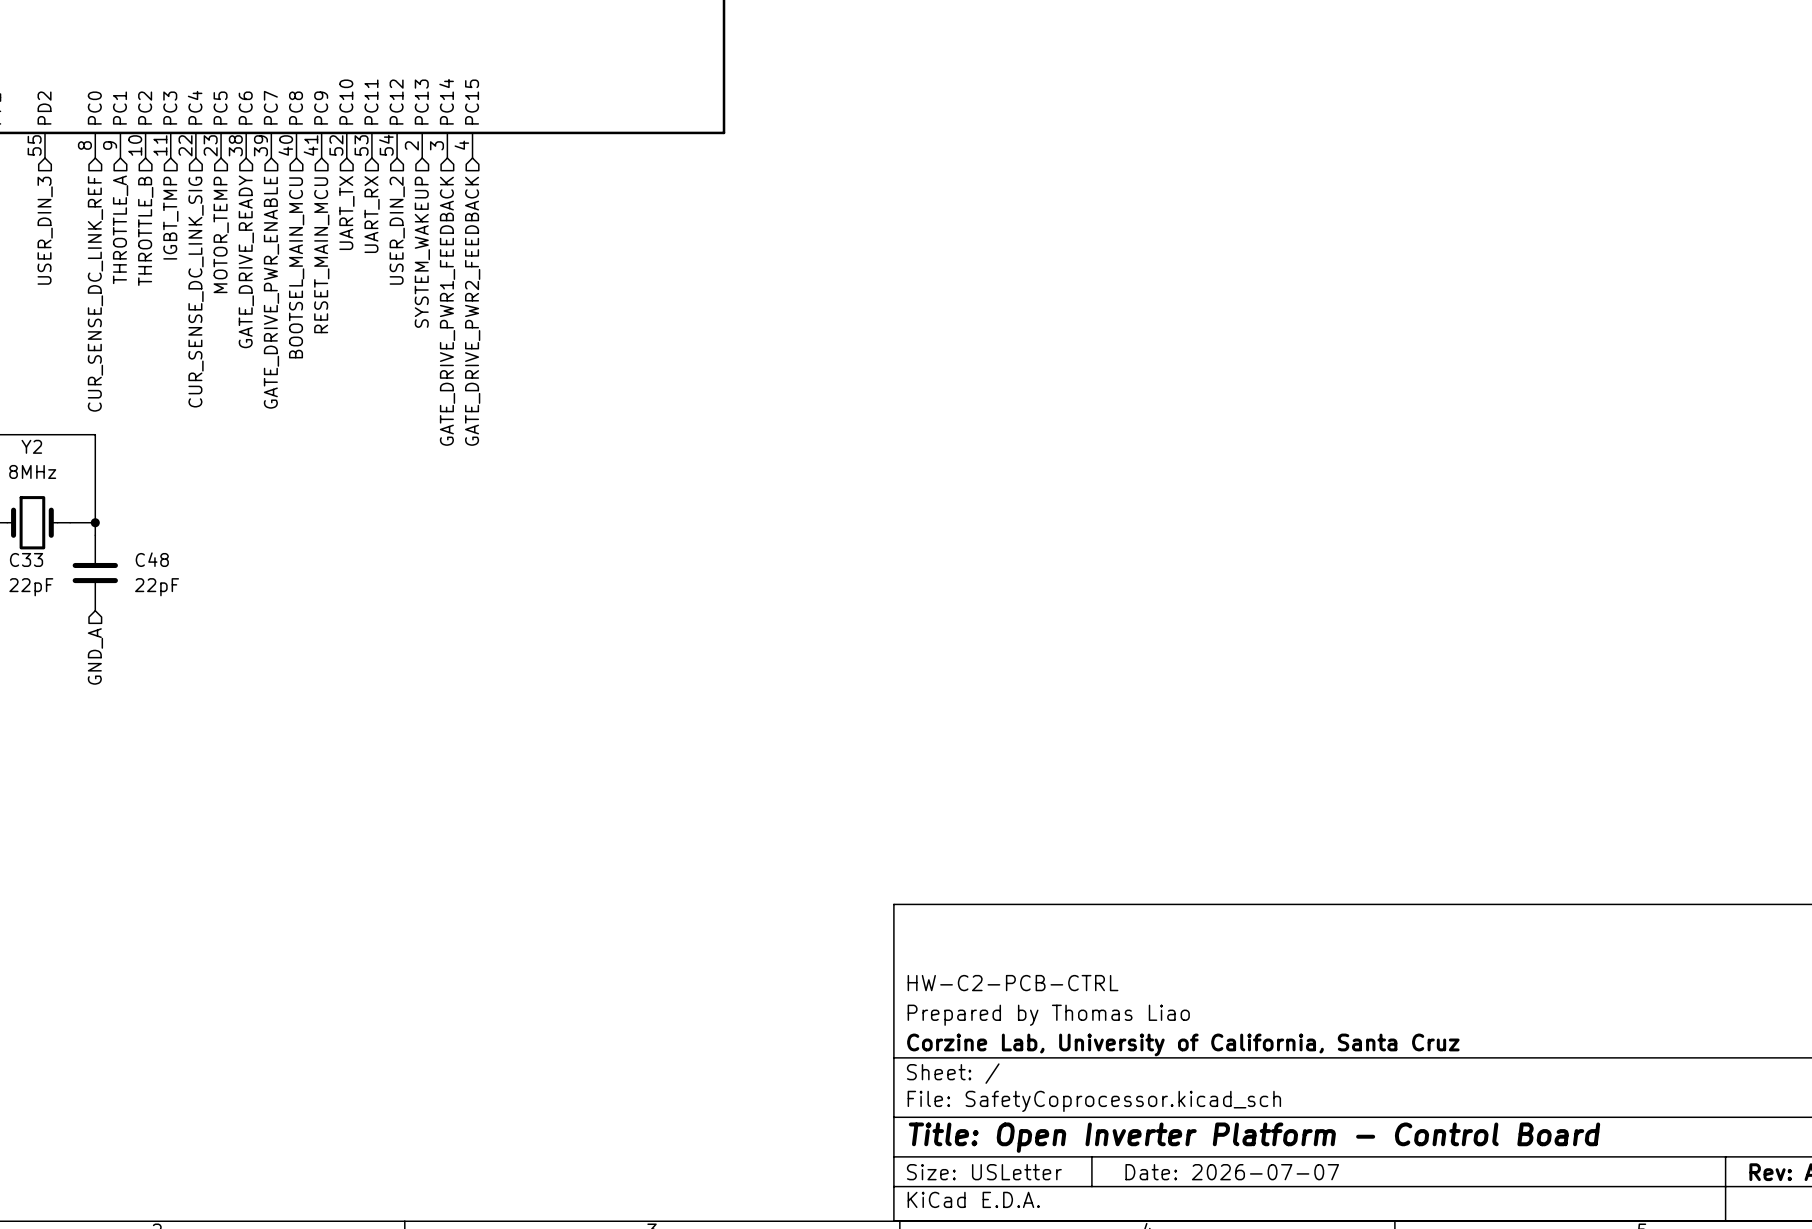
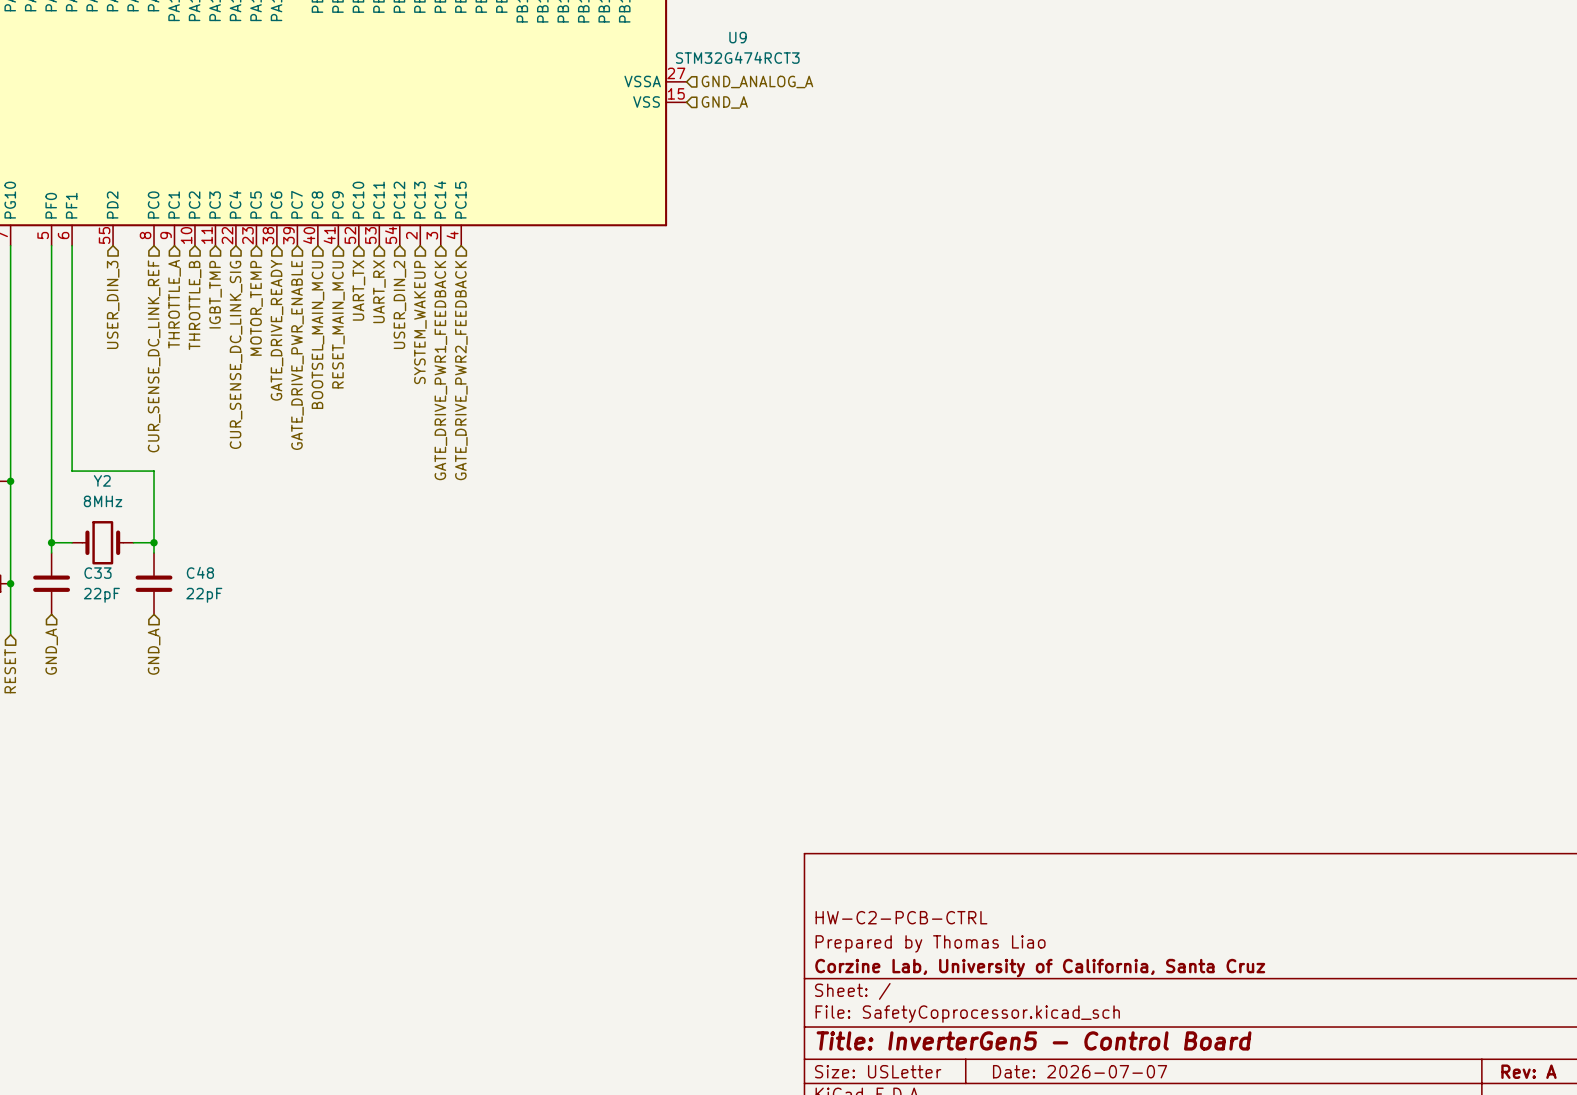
title block: Title: Open Inverter Platform - Control Board (1254, 1137) -> Title: InverterGen5 - Control Board (1034, 1040)

